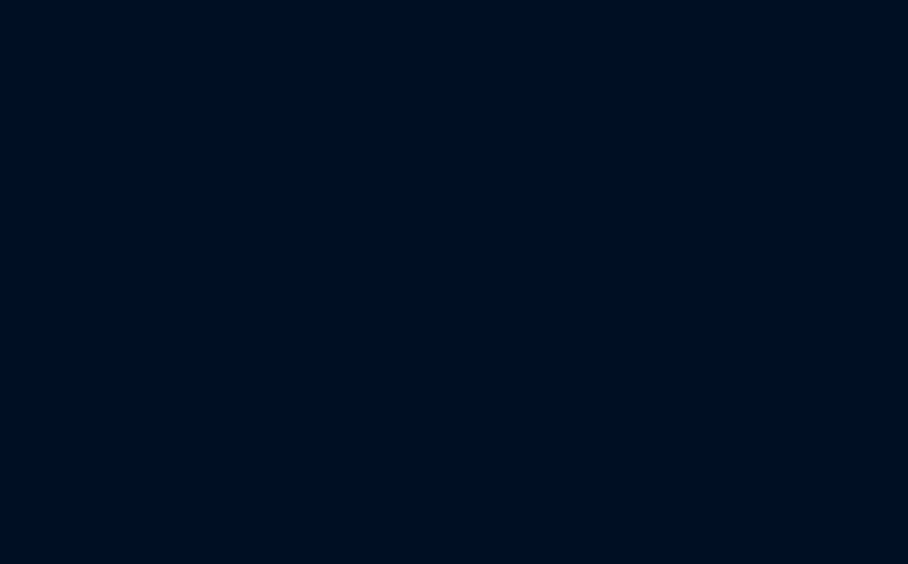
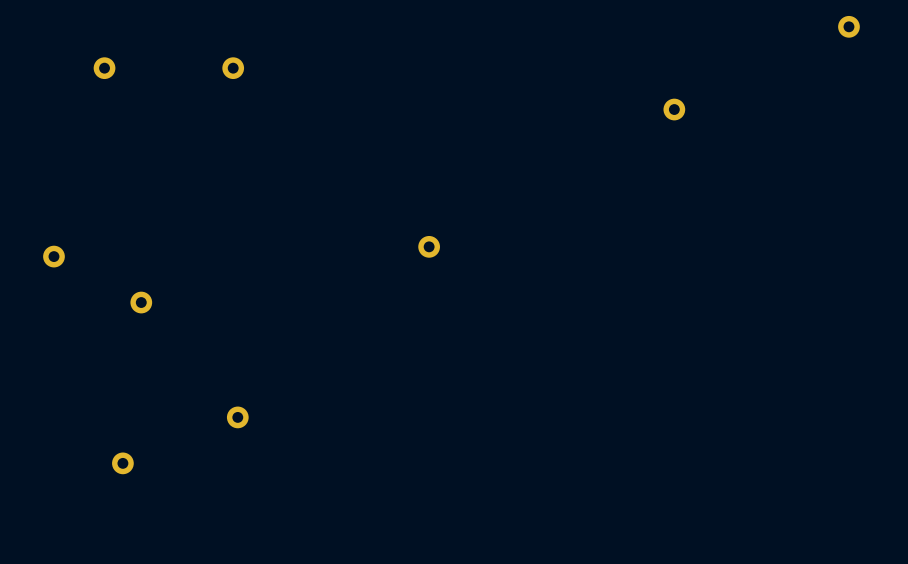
part: none -> (848, 26)
part: none -> (104, 68)
part: none -> (233, 68)
part: none -> (674, 109)
part: none -> (429, 246)
part: none -> (53, 256)
part: none -> (141, 302)
part: none -> (237, 417)
part: none -> (122, 463)

